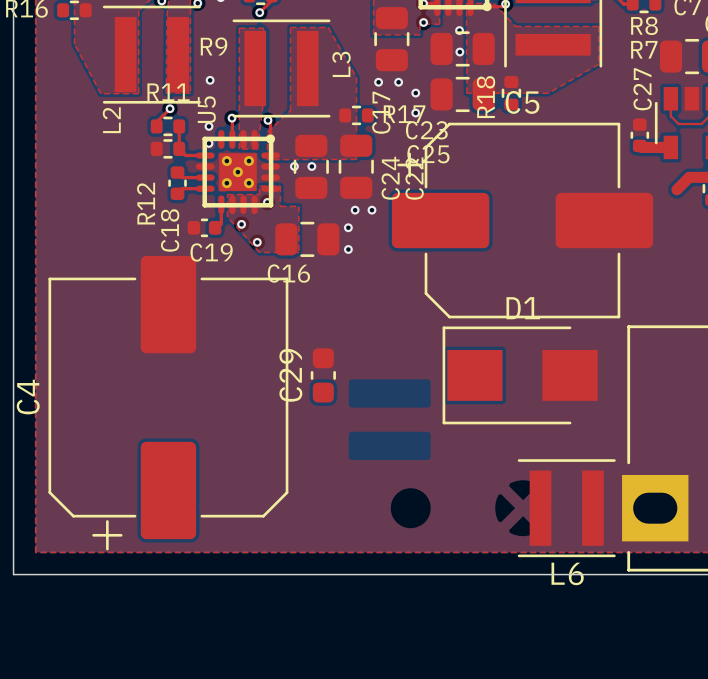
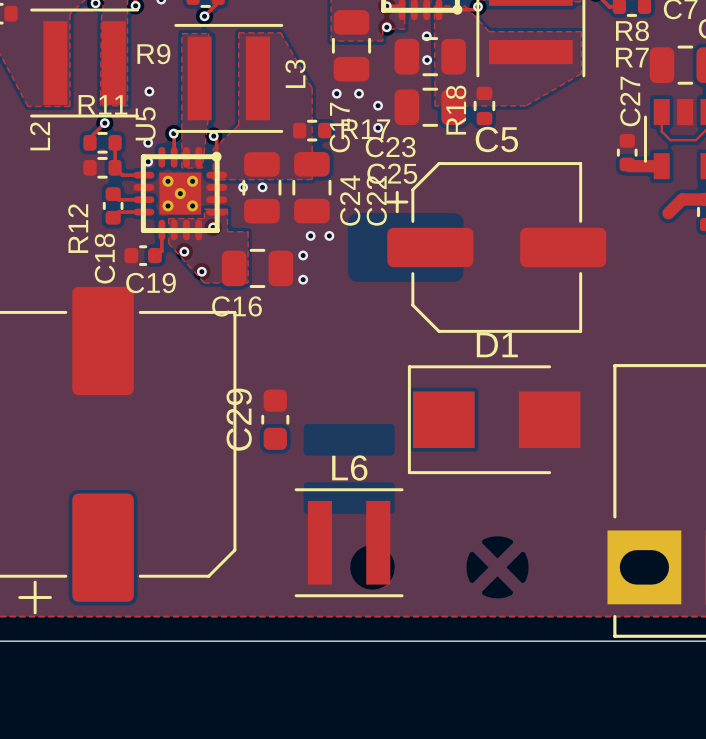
C5 footprint: [391, 122, 654, 319] -> [386, 162, 607, 333]
L6 position: (566, 508) -> (349, 542)
L6 name position: L6 (567, 573) -> L6 (349, 468)

